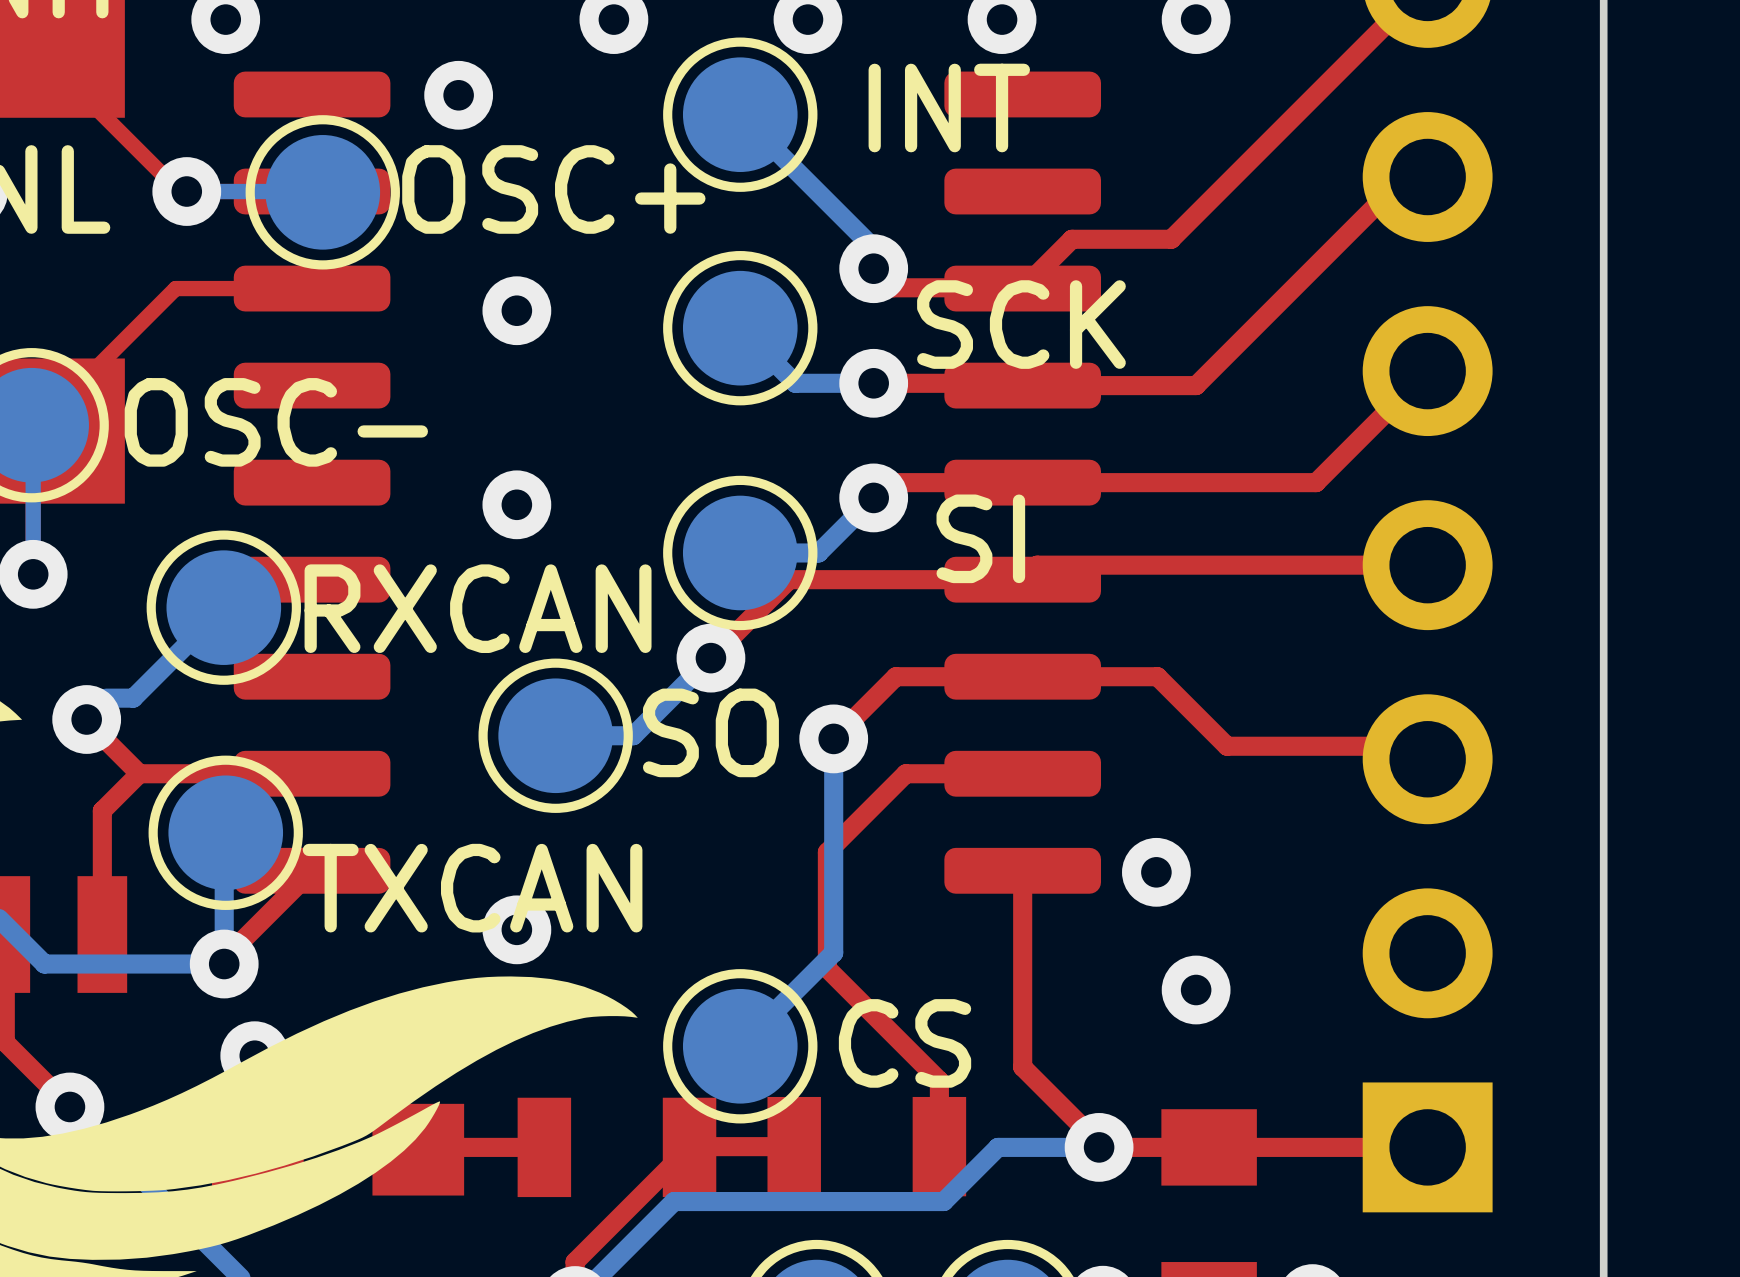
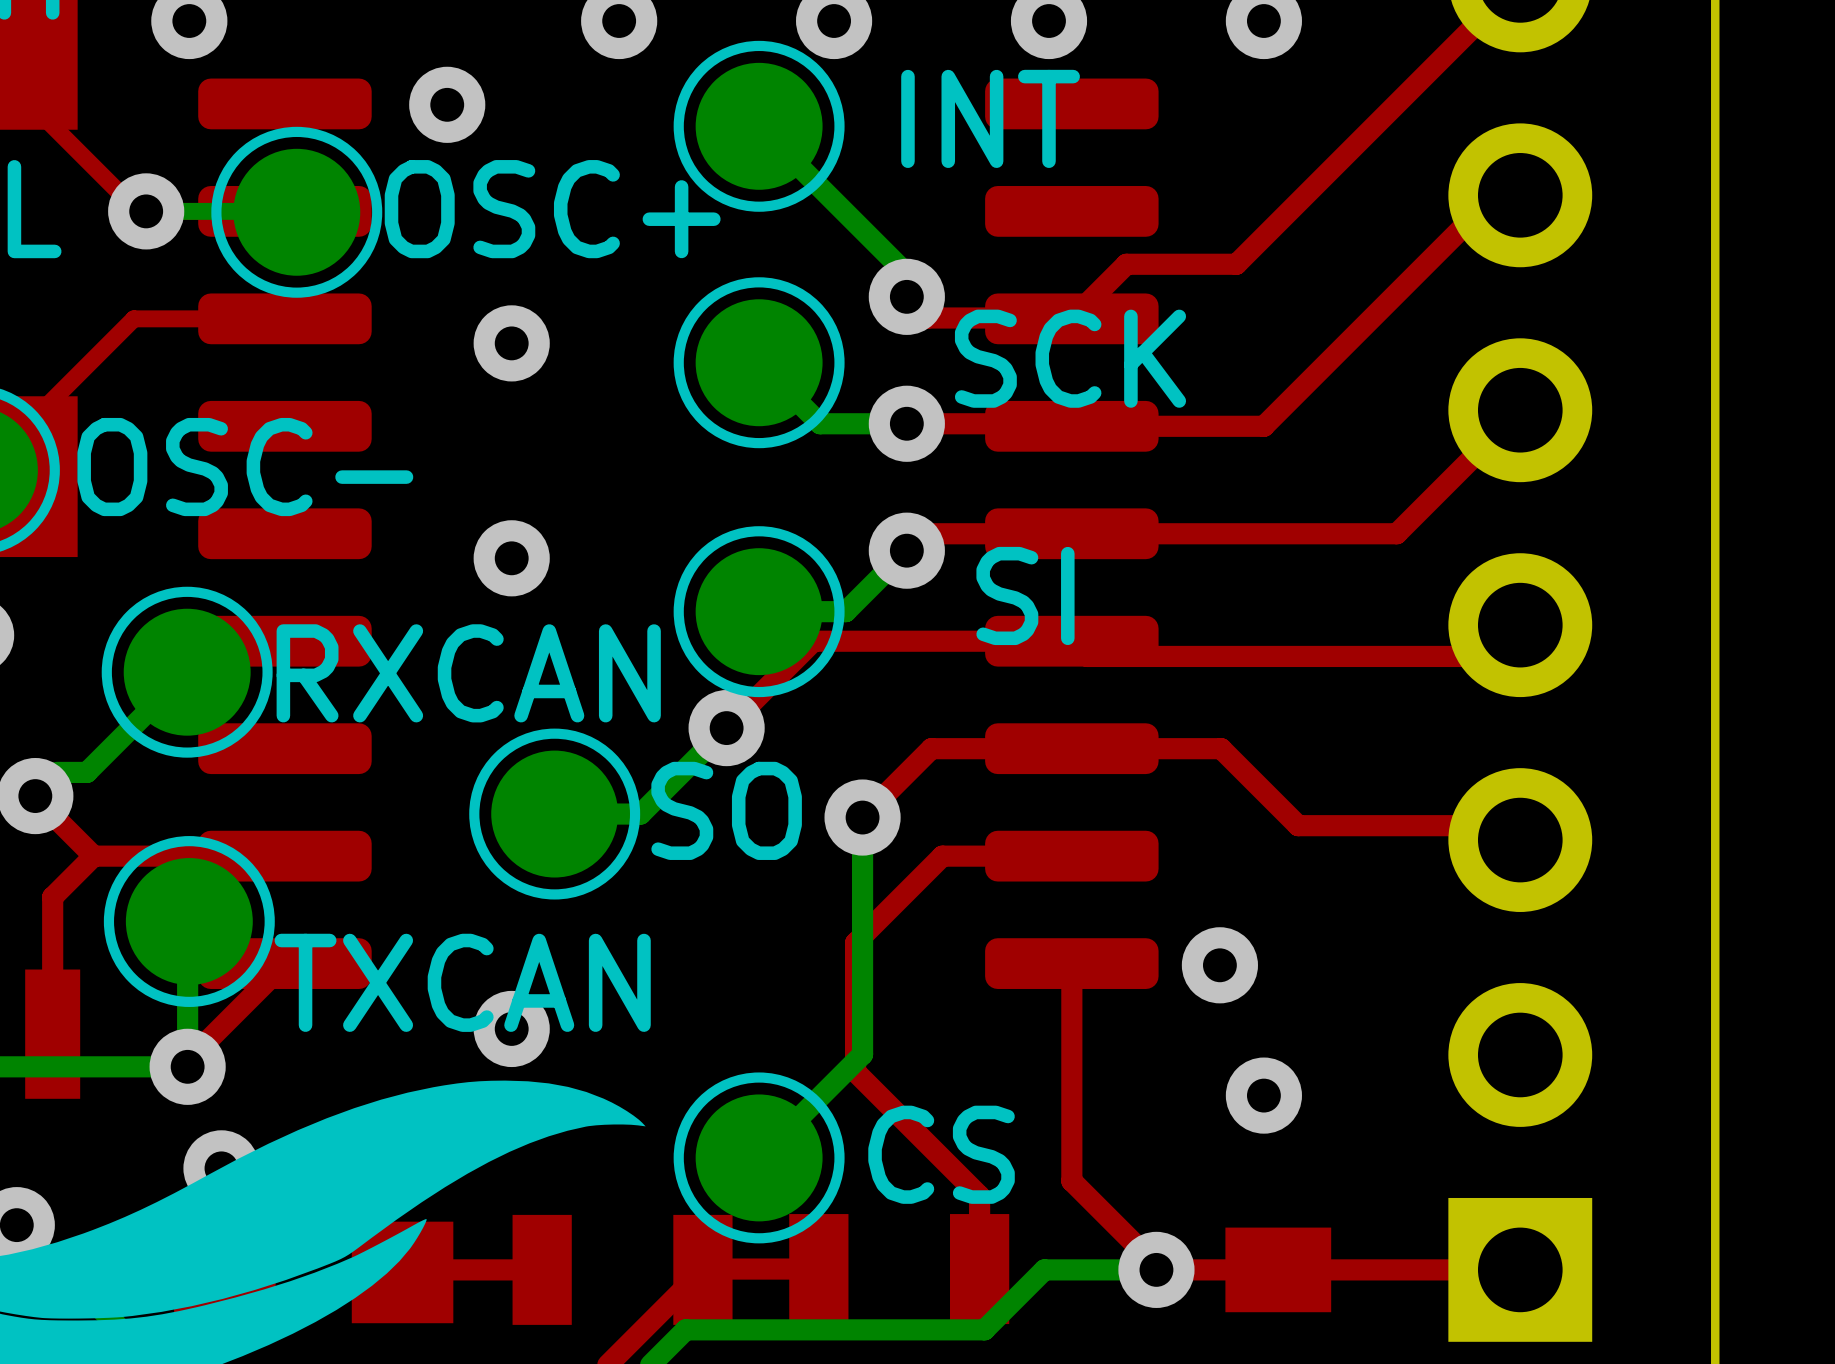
top track: (1427, 565) (1037, 565) (1022, 579) -> (1488, 656) (1087, 656) (1071, 641)

